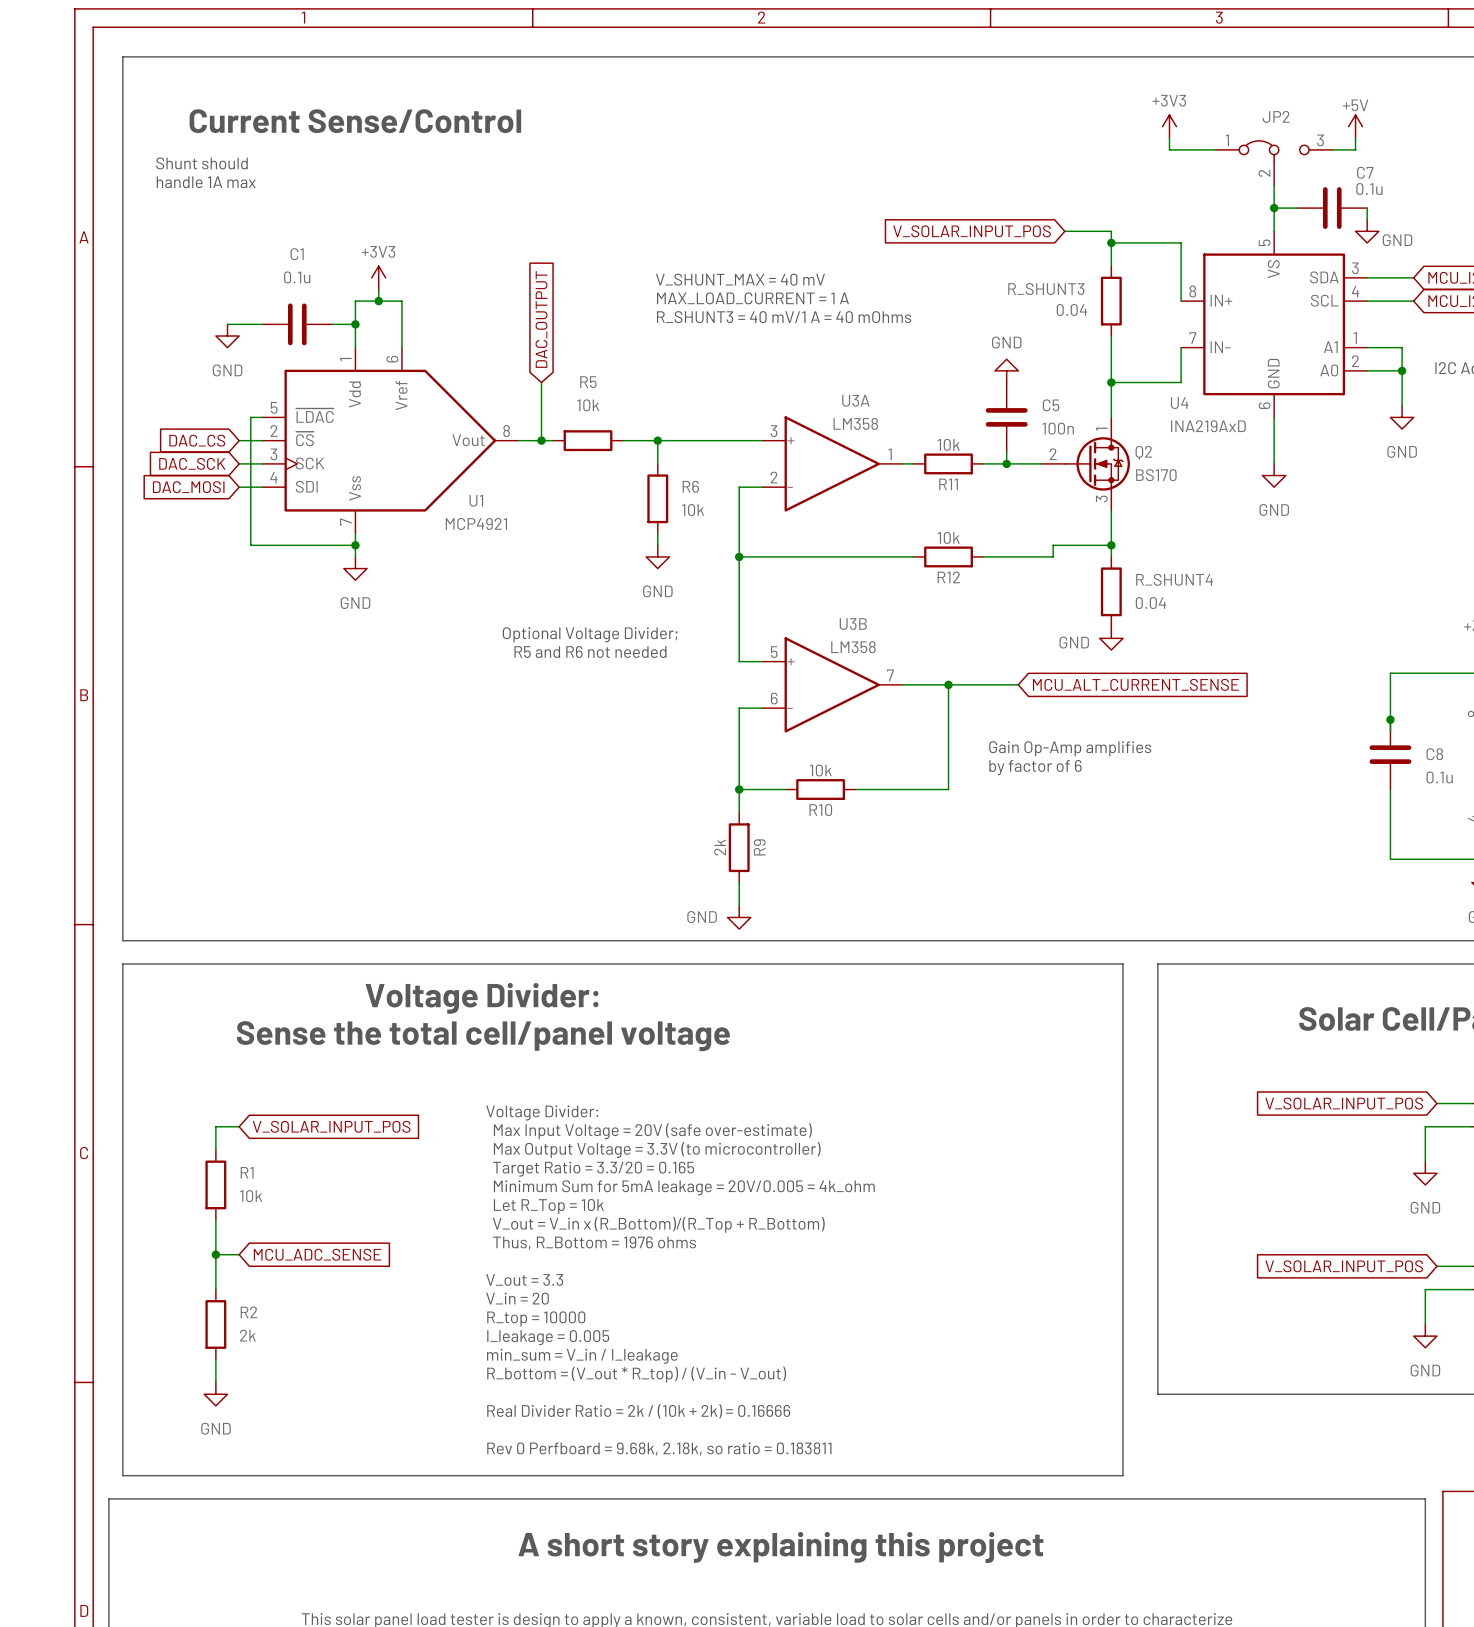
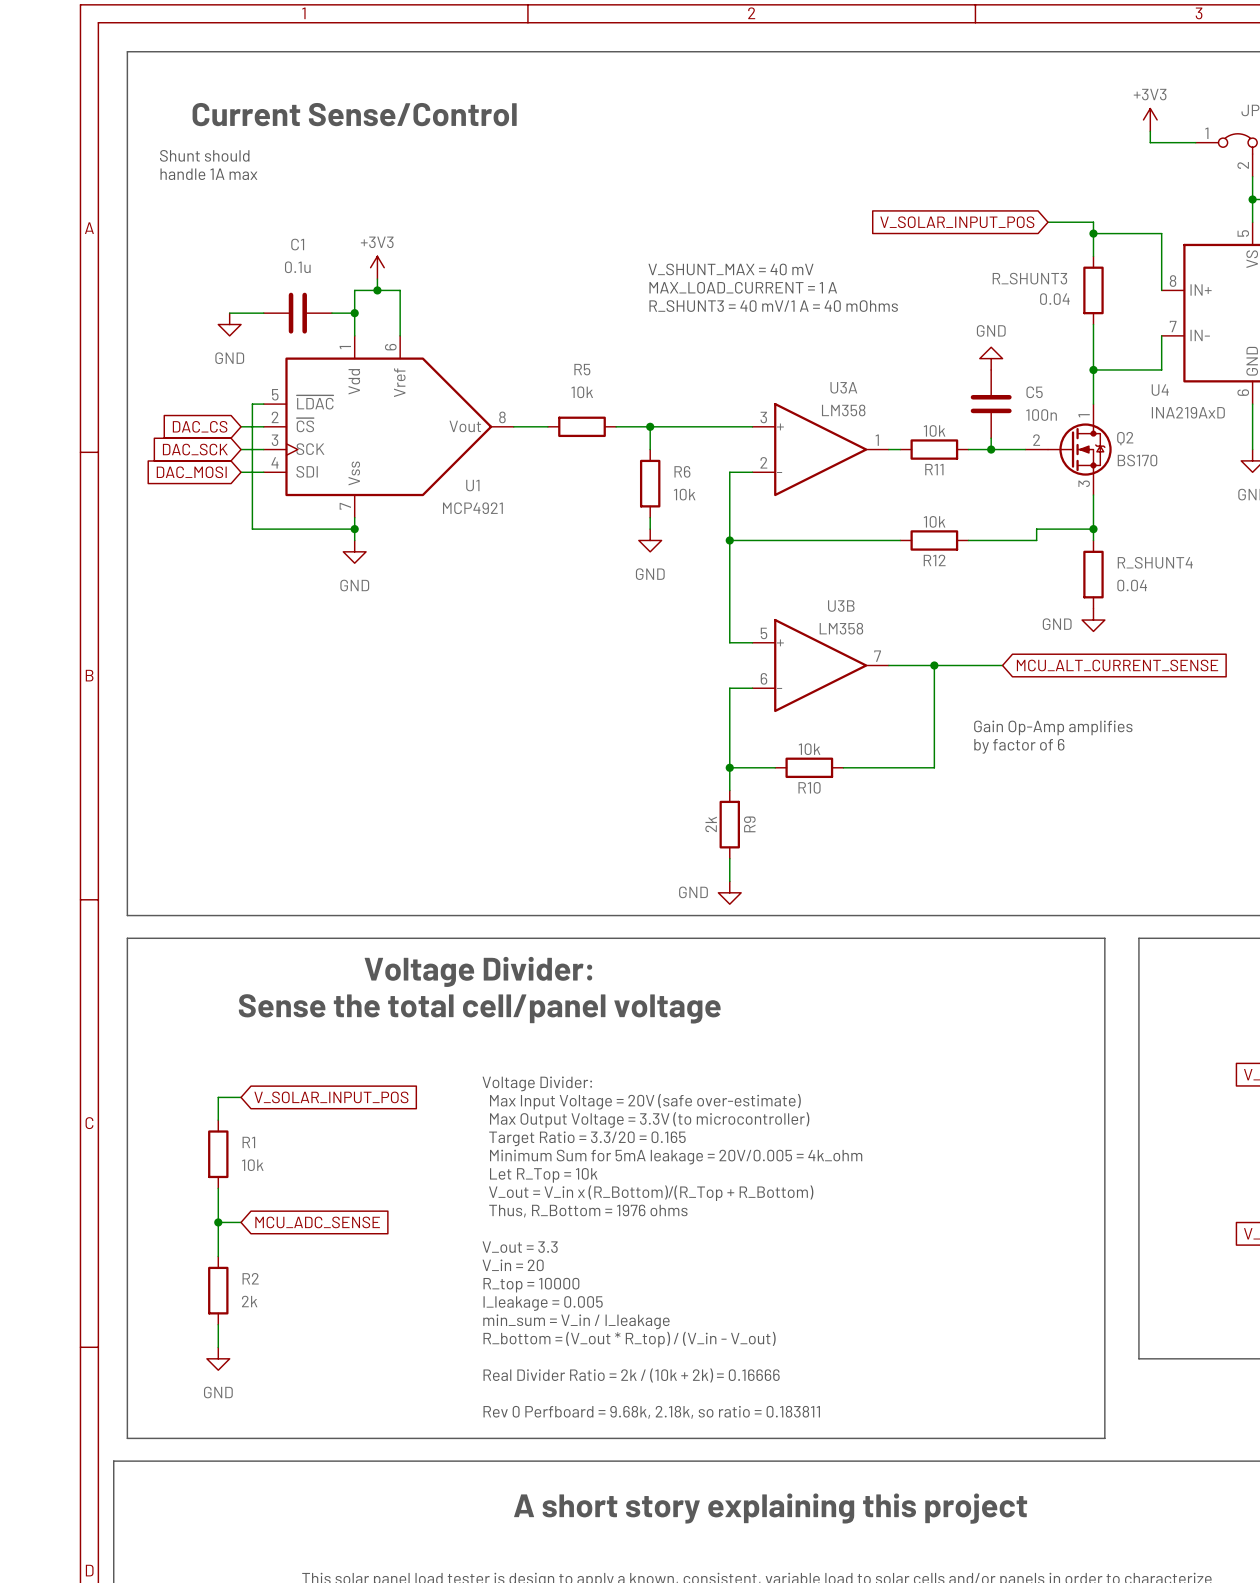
global label: DAC_OUTPUT (541, 319) -> none
wire: (541, 382) (541, 440) -> none
junction: (541, 440) -> none
text: Optional Voltage Divider; (590, 634) -> none
text: R5 and R6 not needed (590, 651) -> none

